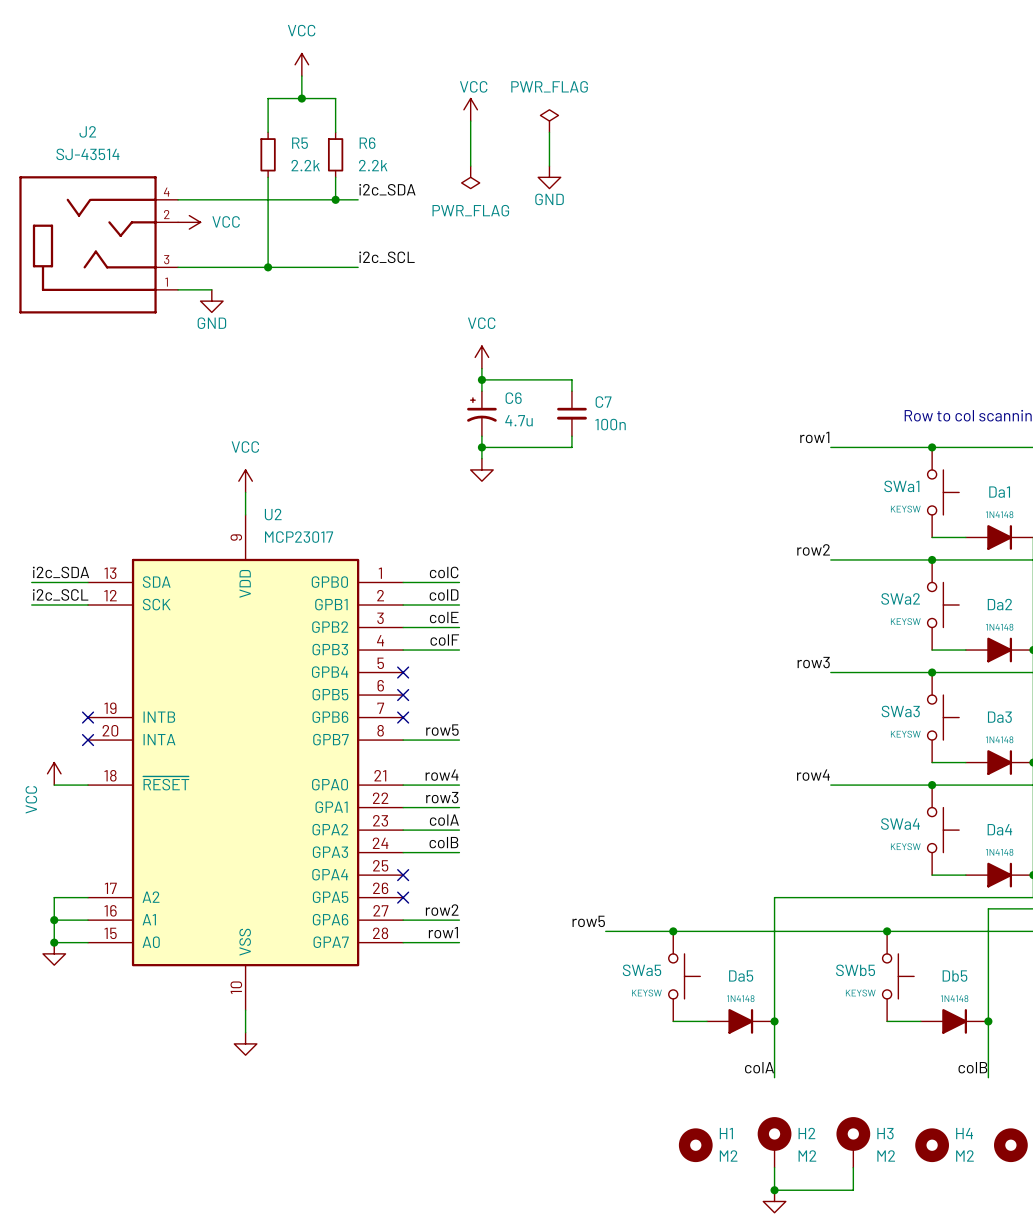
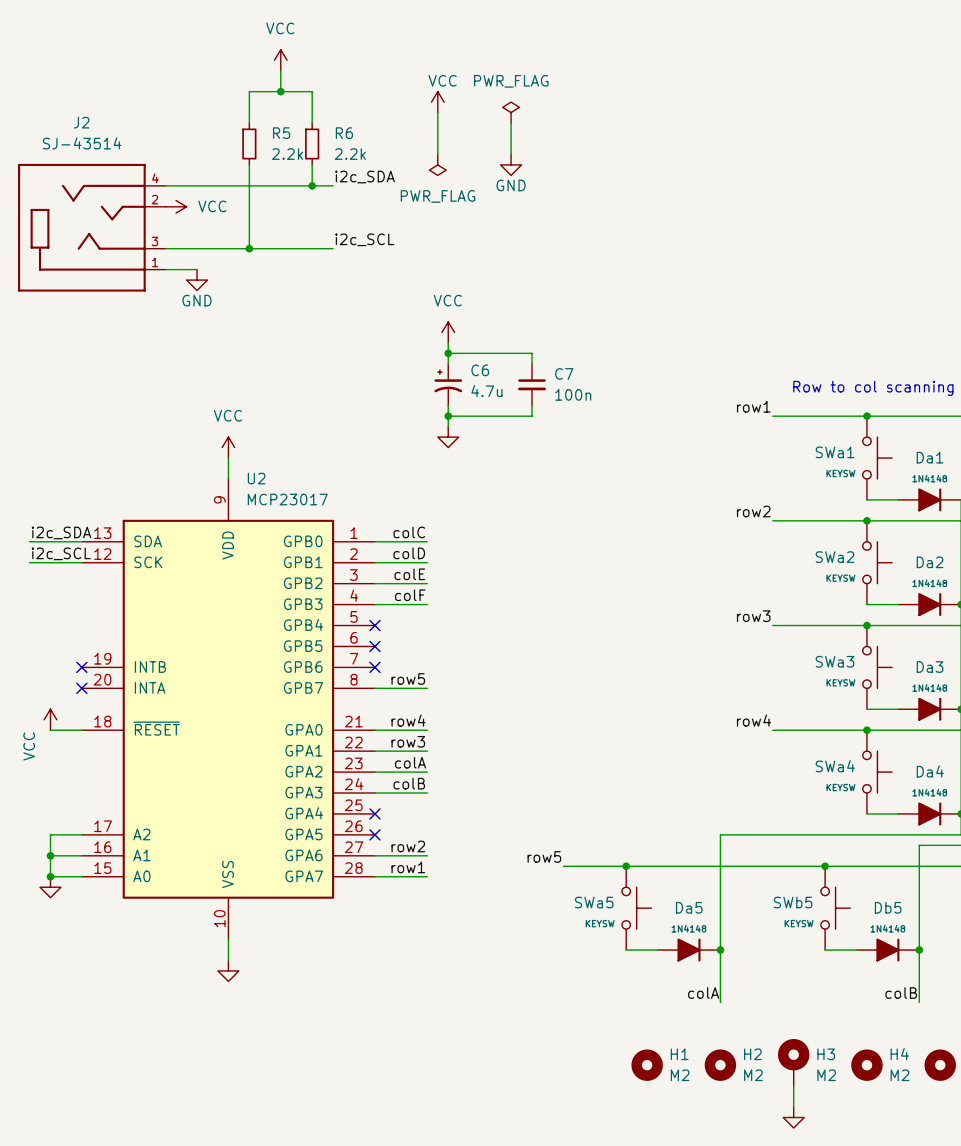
H2 symbol: [757, 1117, 792, 1168] -> [704, 1049, 737, 1081]
wire: (774, 1167) (774, 1190) (853, 1190) -> none
junction: (774, 1190) -> none
power symbol position: (774, 1201) -> (793, 1117)

